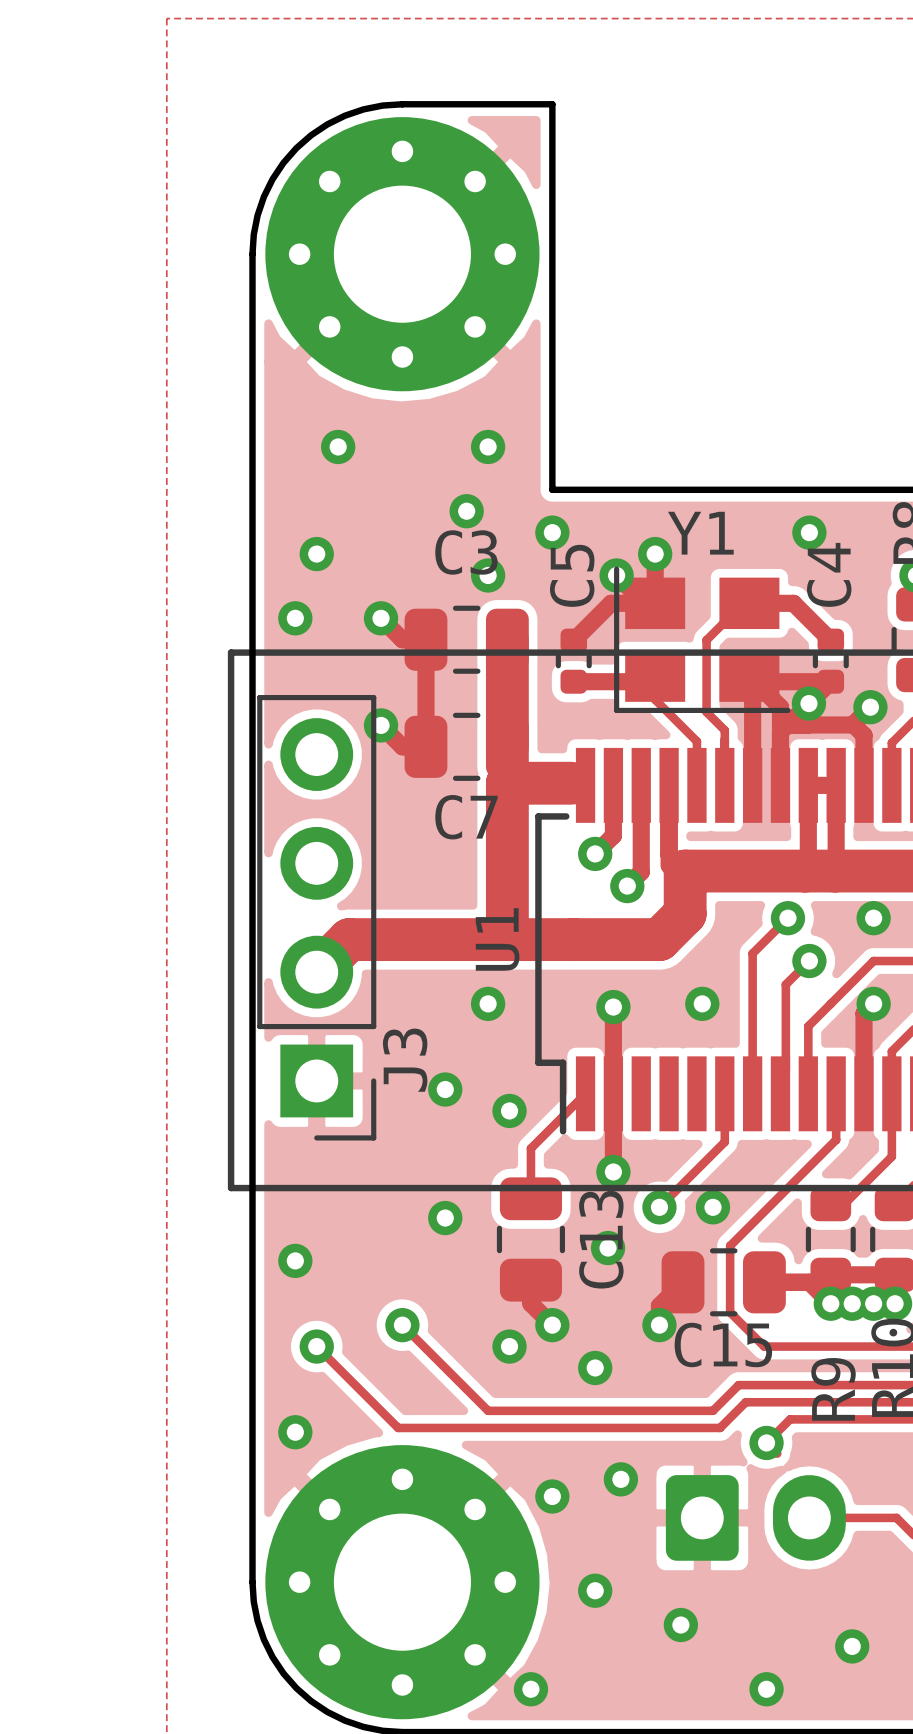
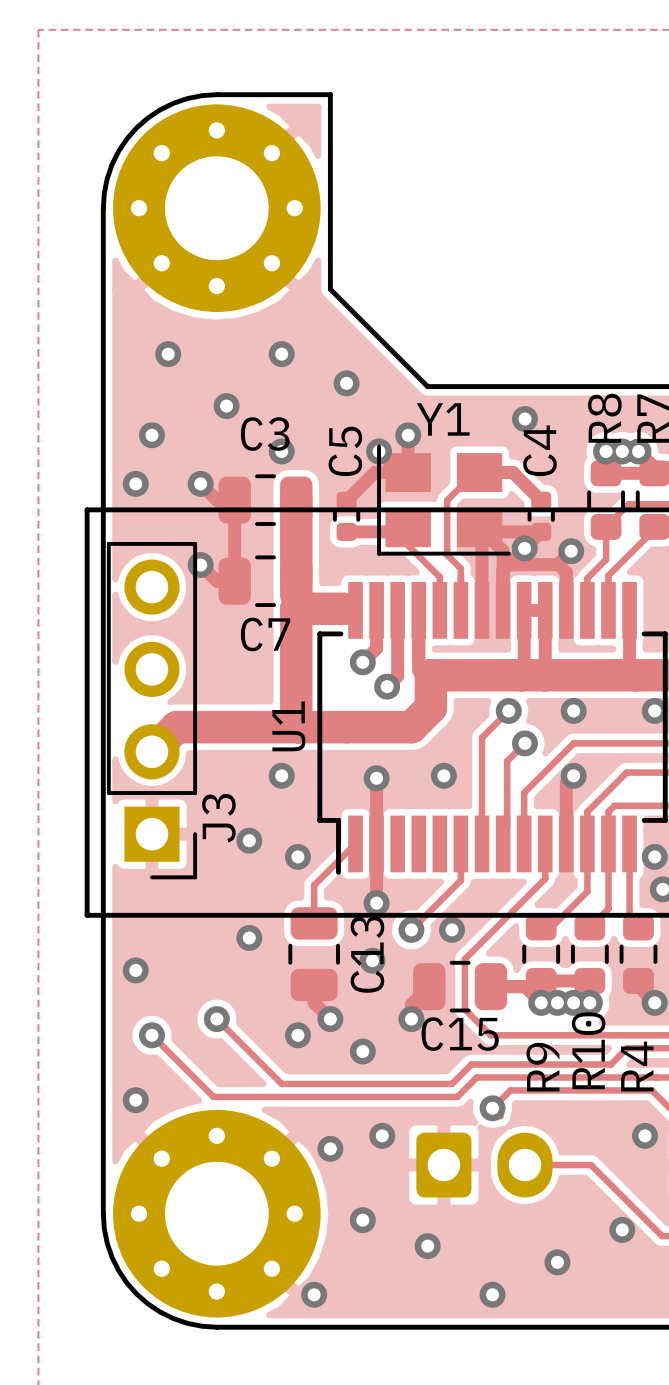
board edge: (552, 361) (552, 489) (680, 489) -> (330, 289) (427, 386)
via position: (466, 511) -> (226, 406)
via position: (552, 532) -> (346, 383)

